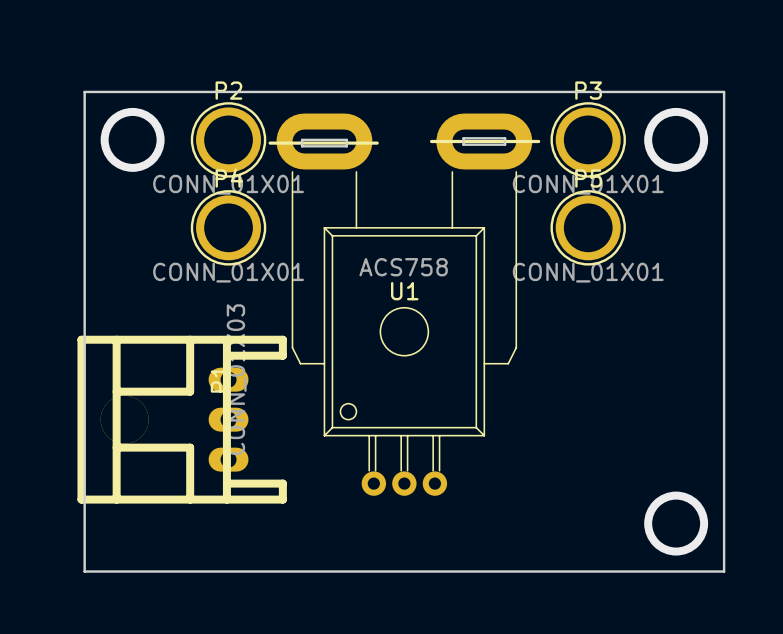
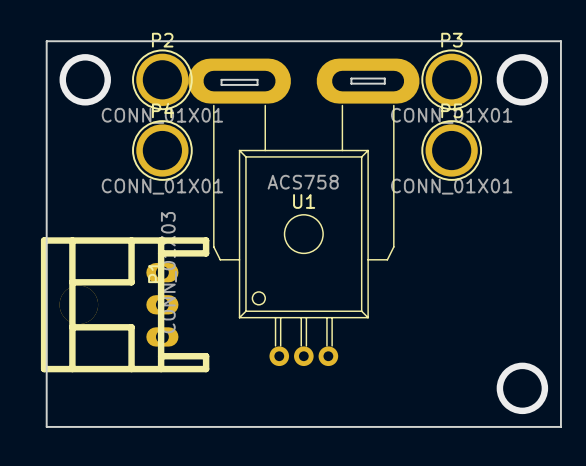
U1 footprint: [276, 113, 533, 496] -> [188, 58, 420, 367]
line: (431, 141) (538, 141) -> none
line: (270, 143) (377, 143) -> none

